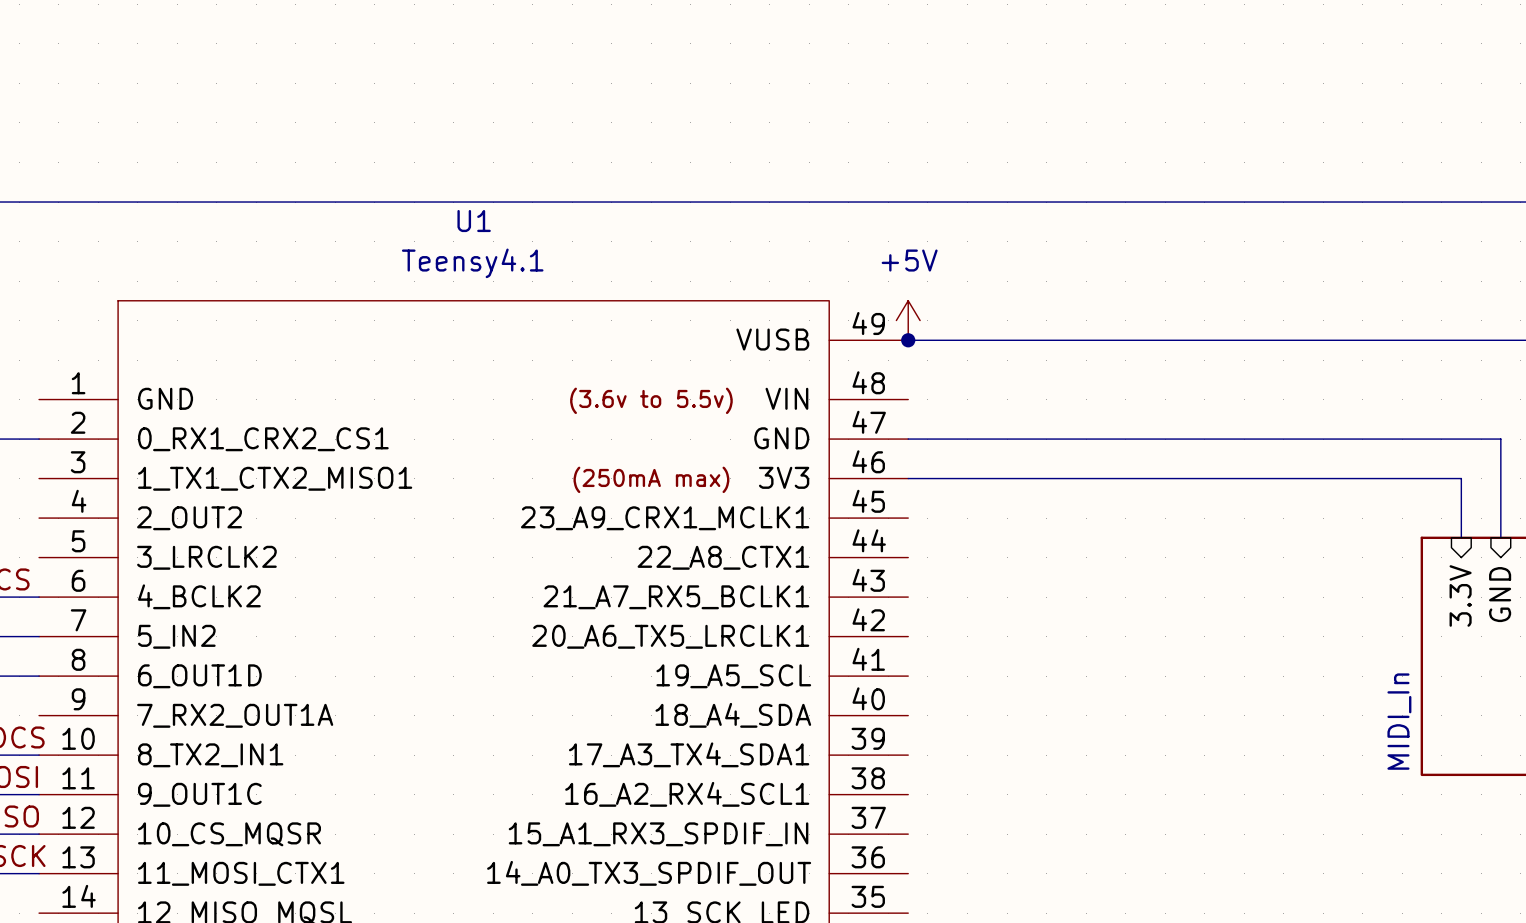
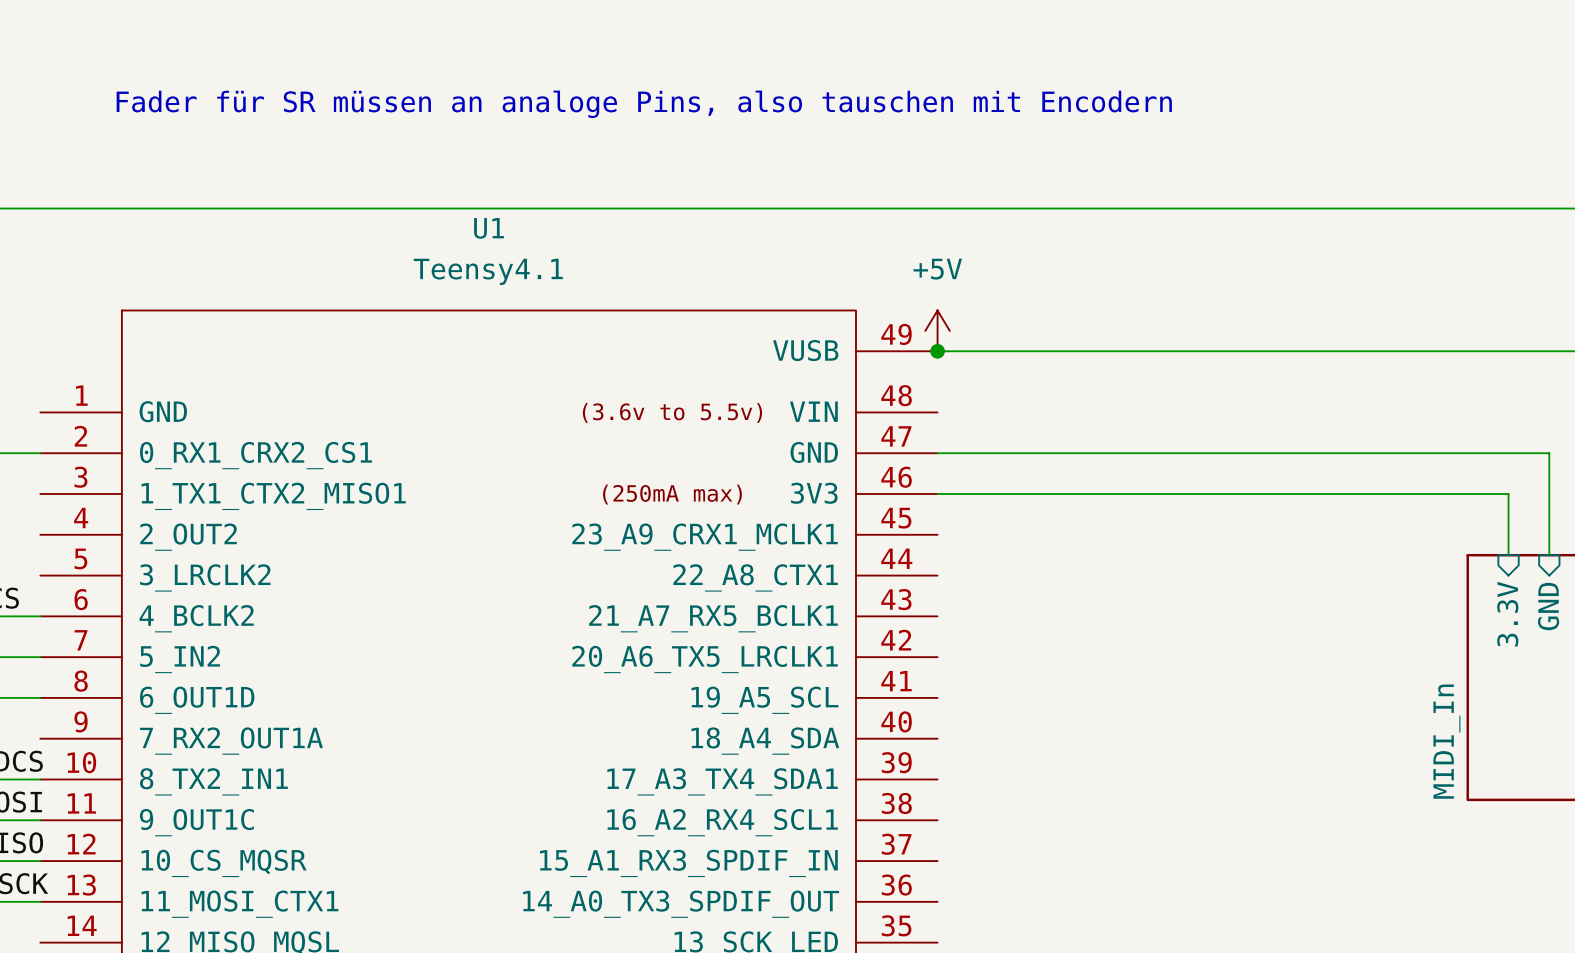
text: none -> Fader für SR müssen an analoge Pins, also tauschen mit Encodern (644, 104)

